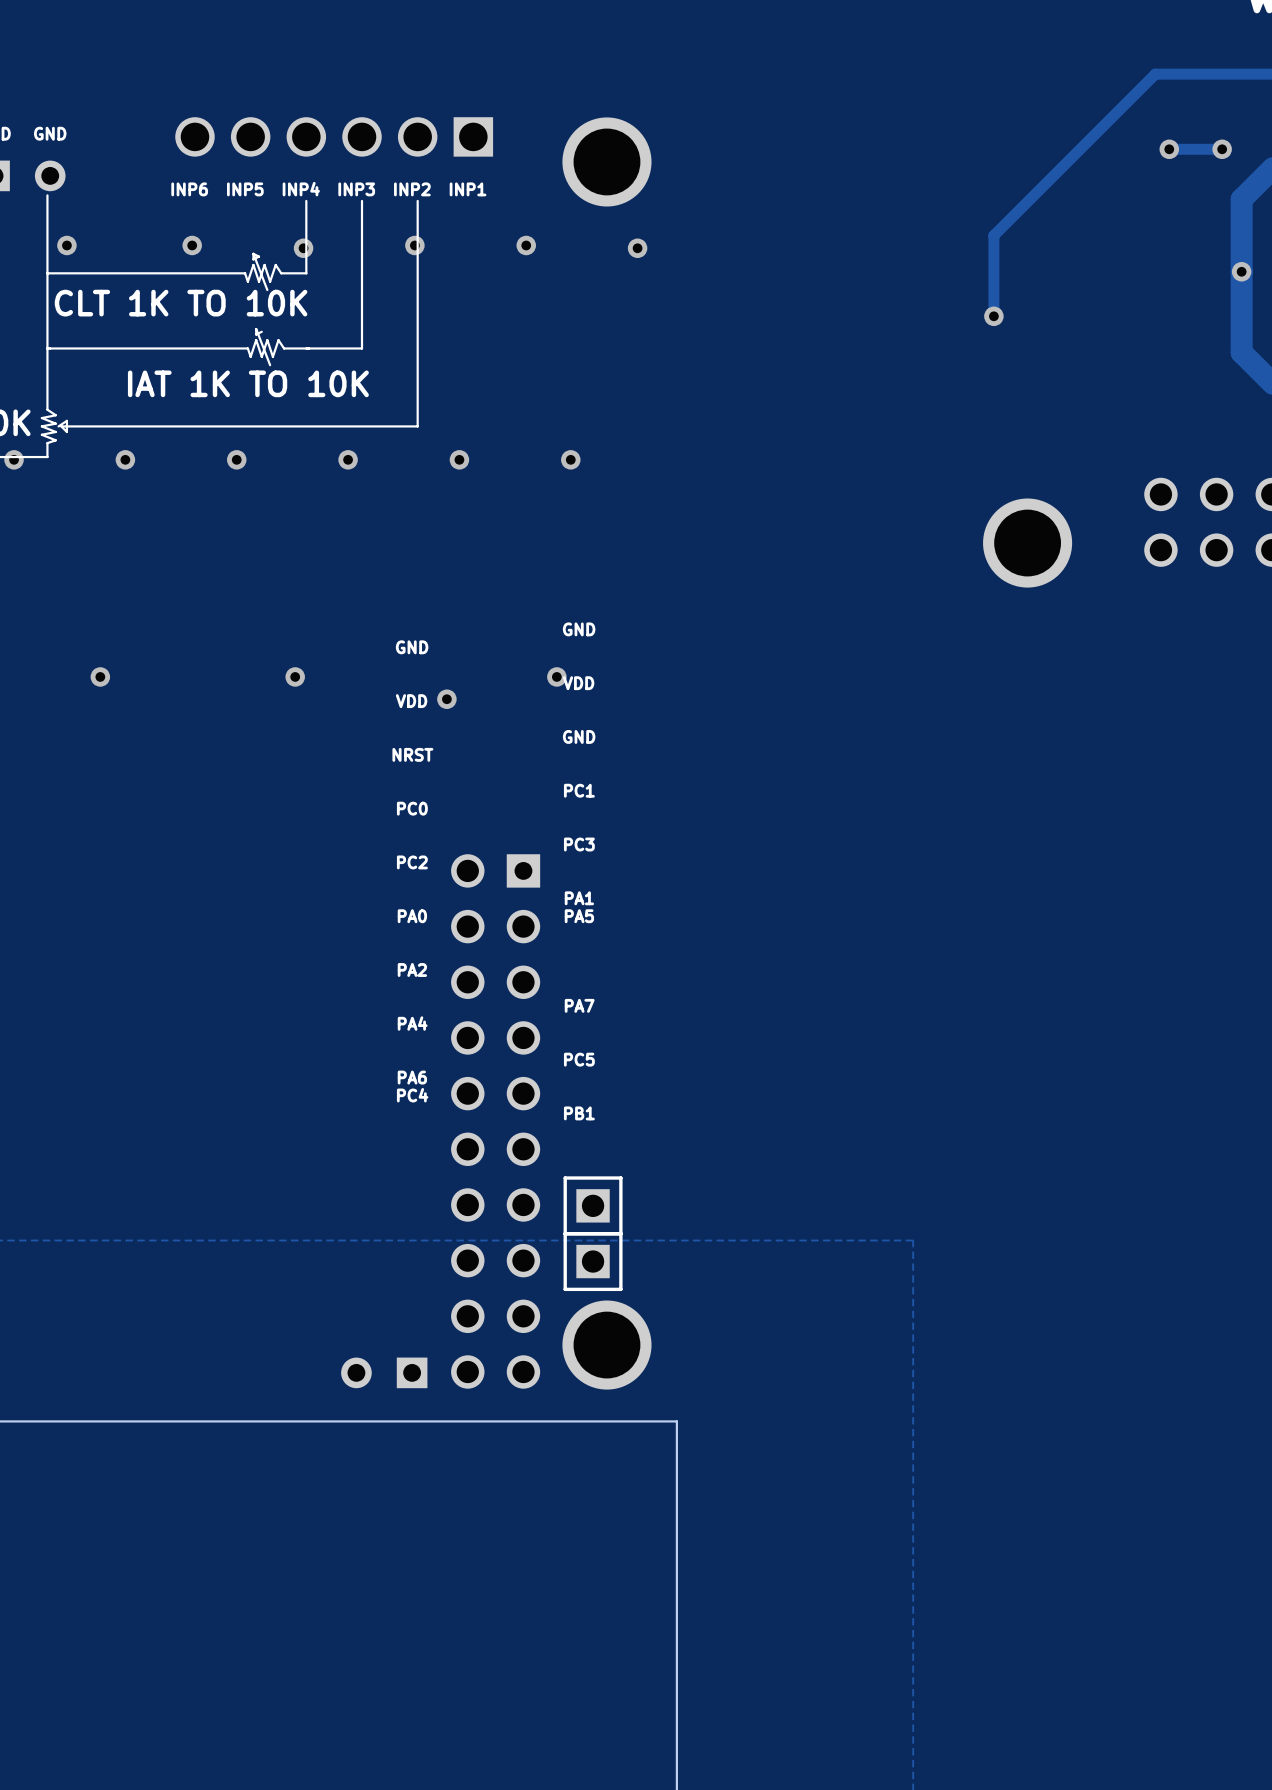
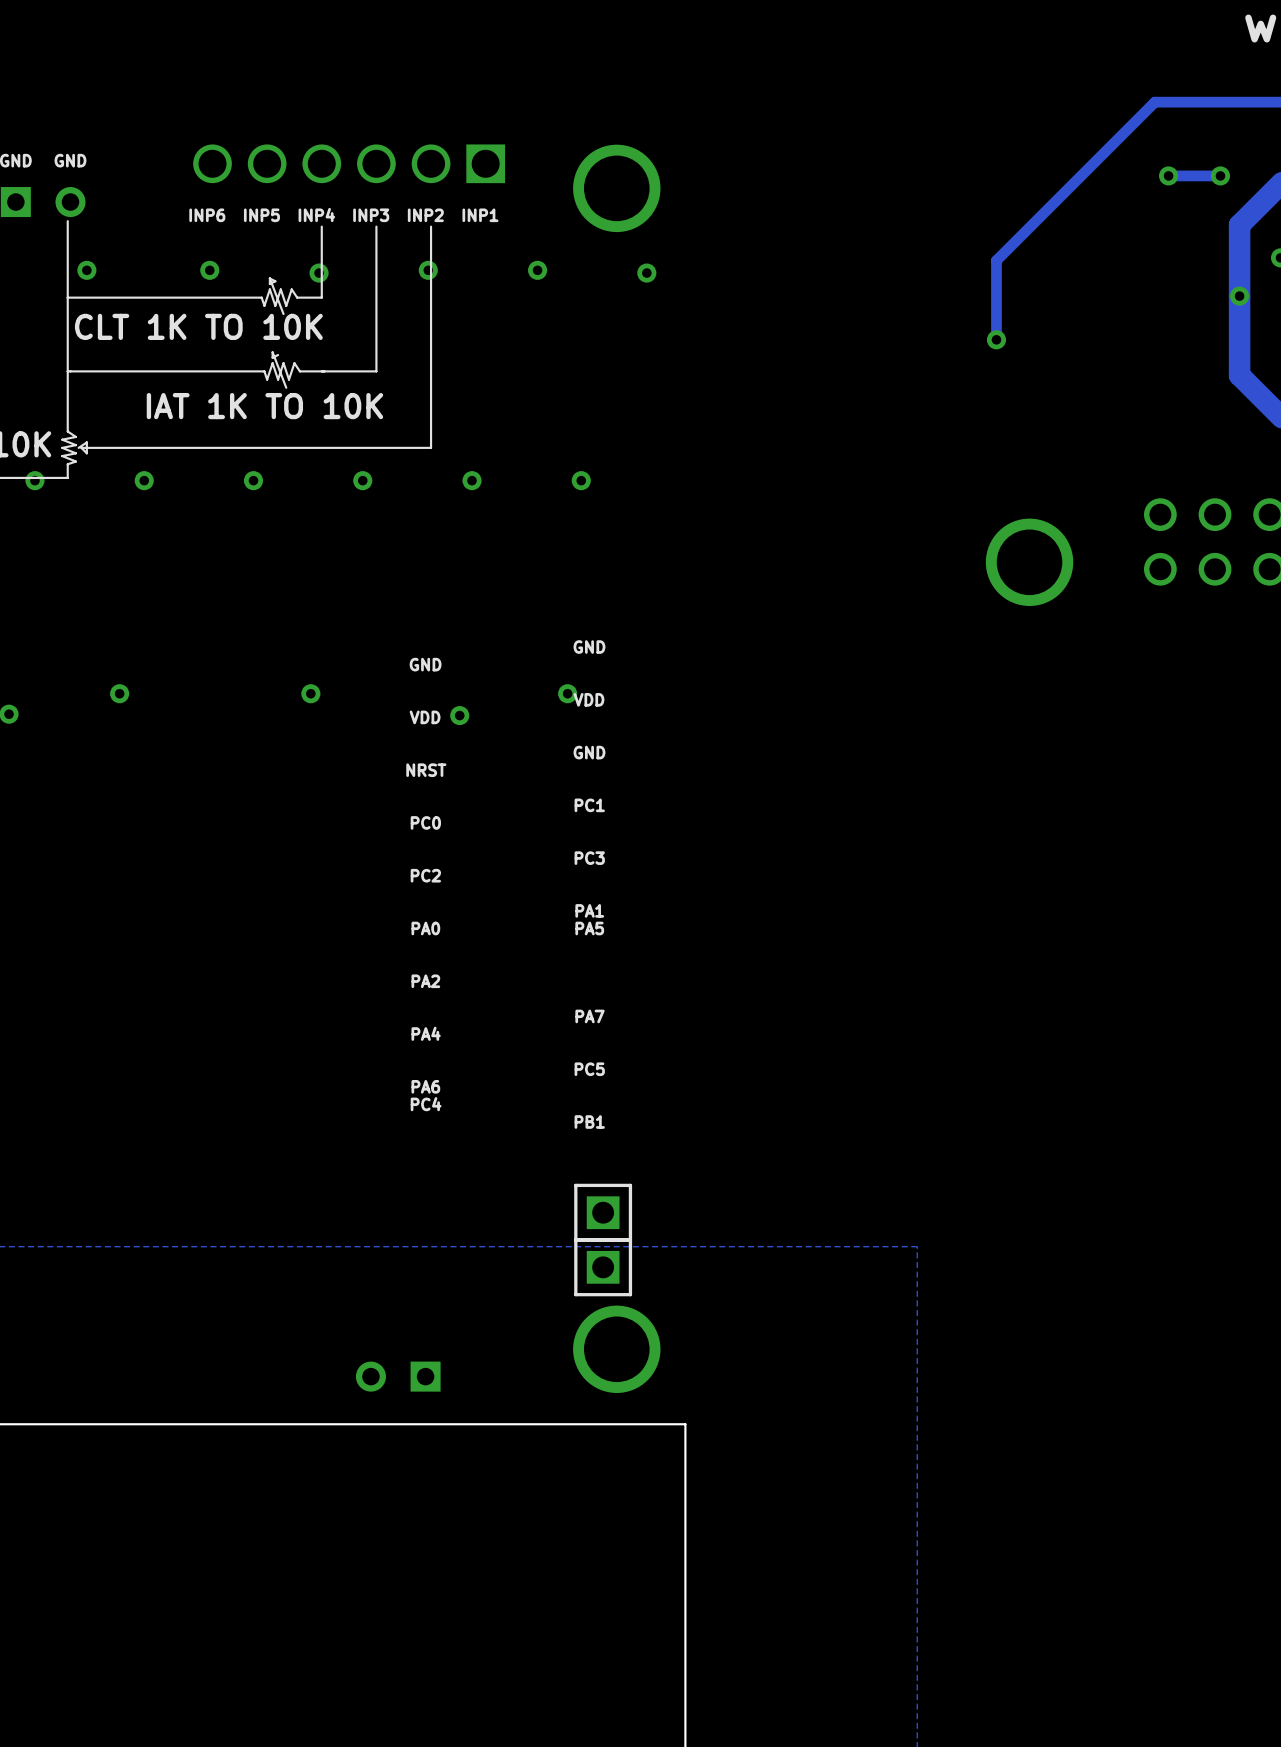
part: (495, 1121) -> none

